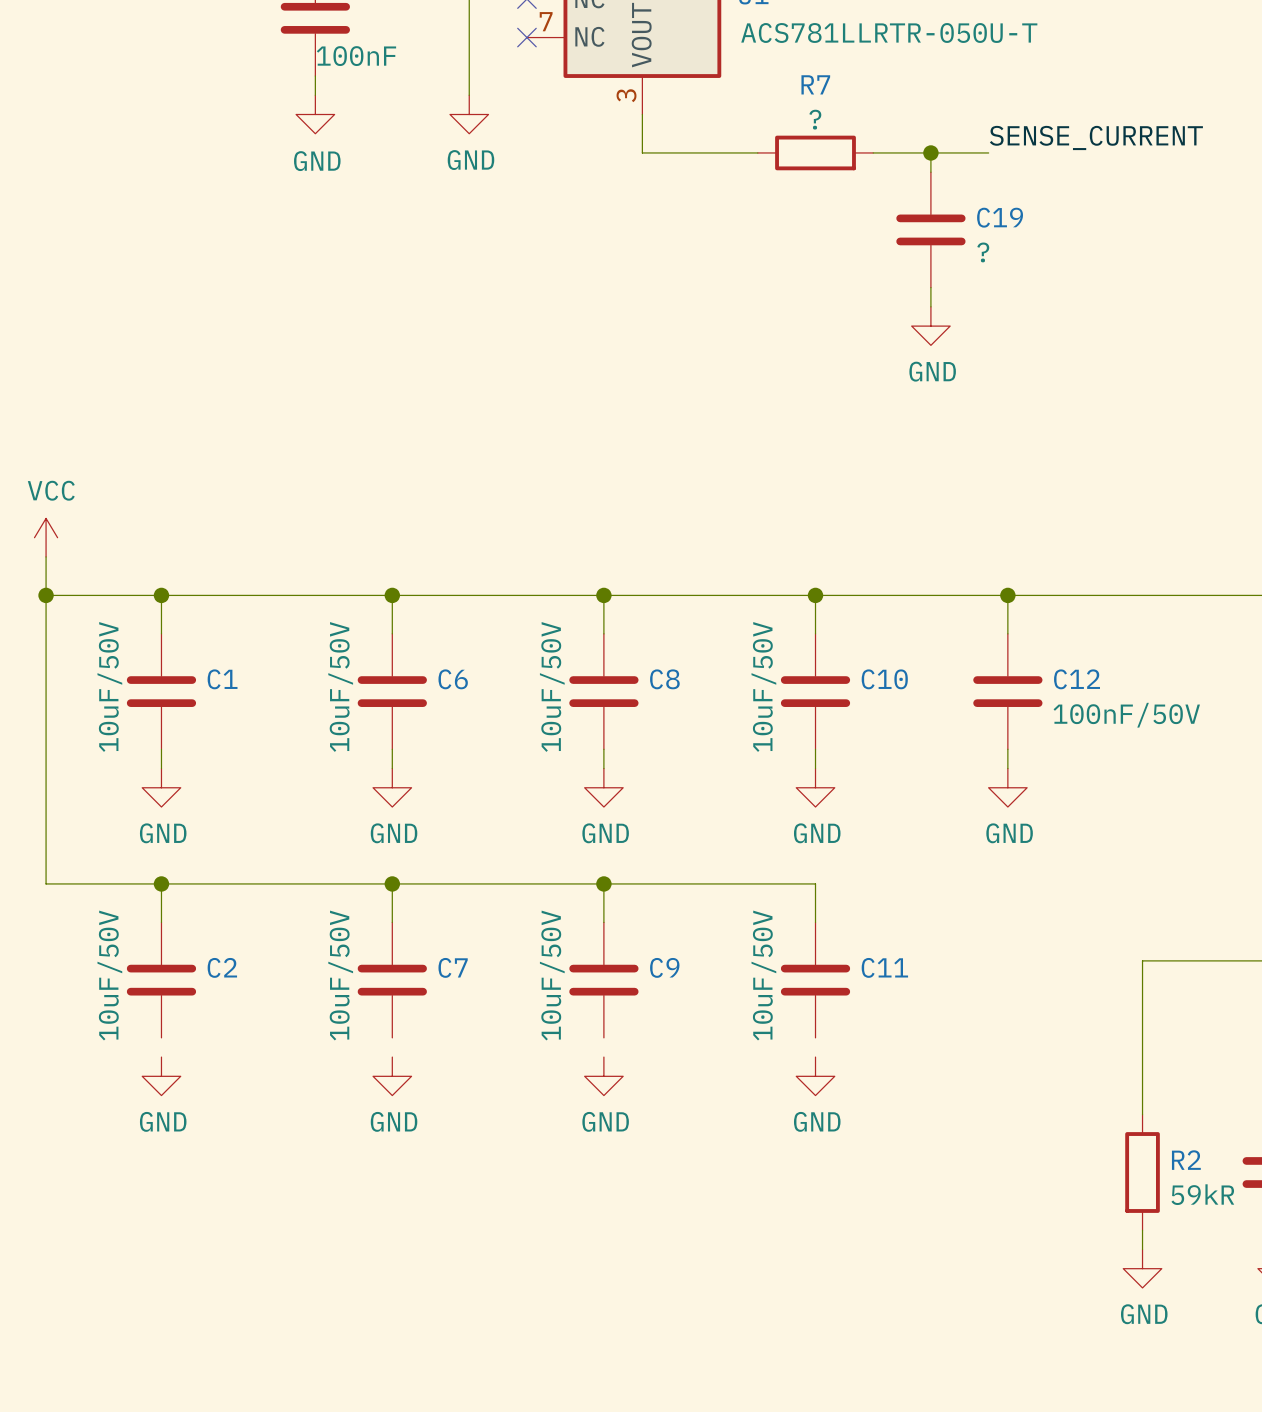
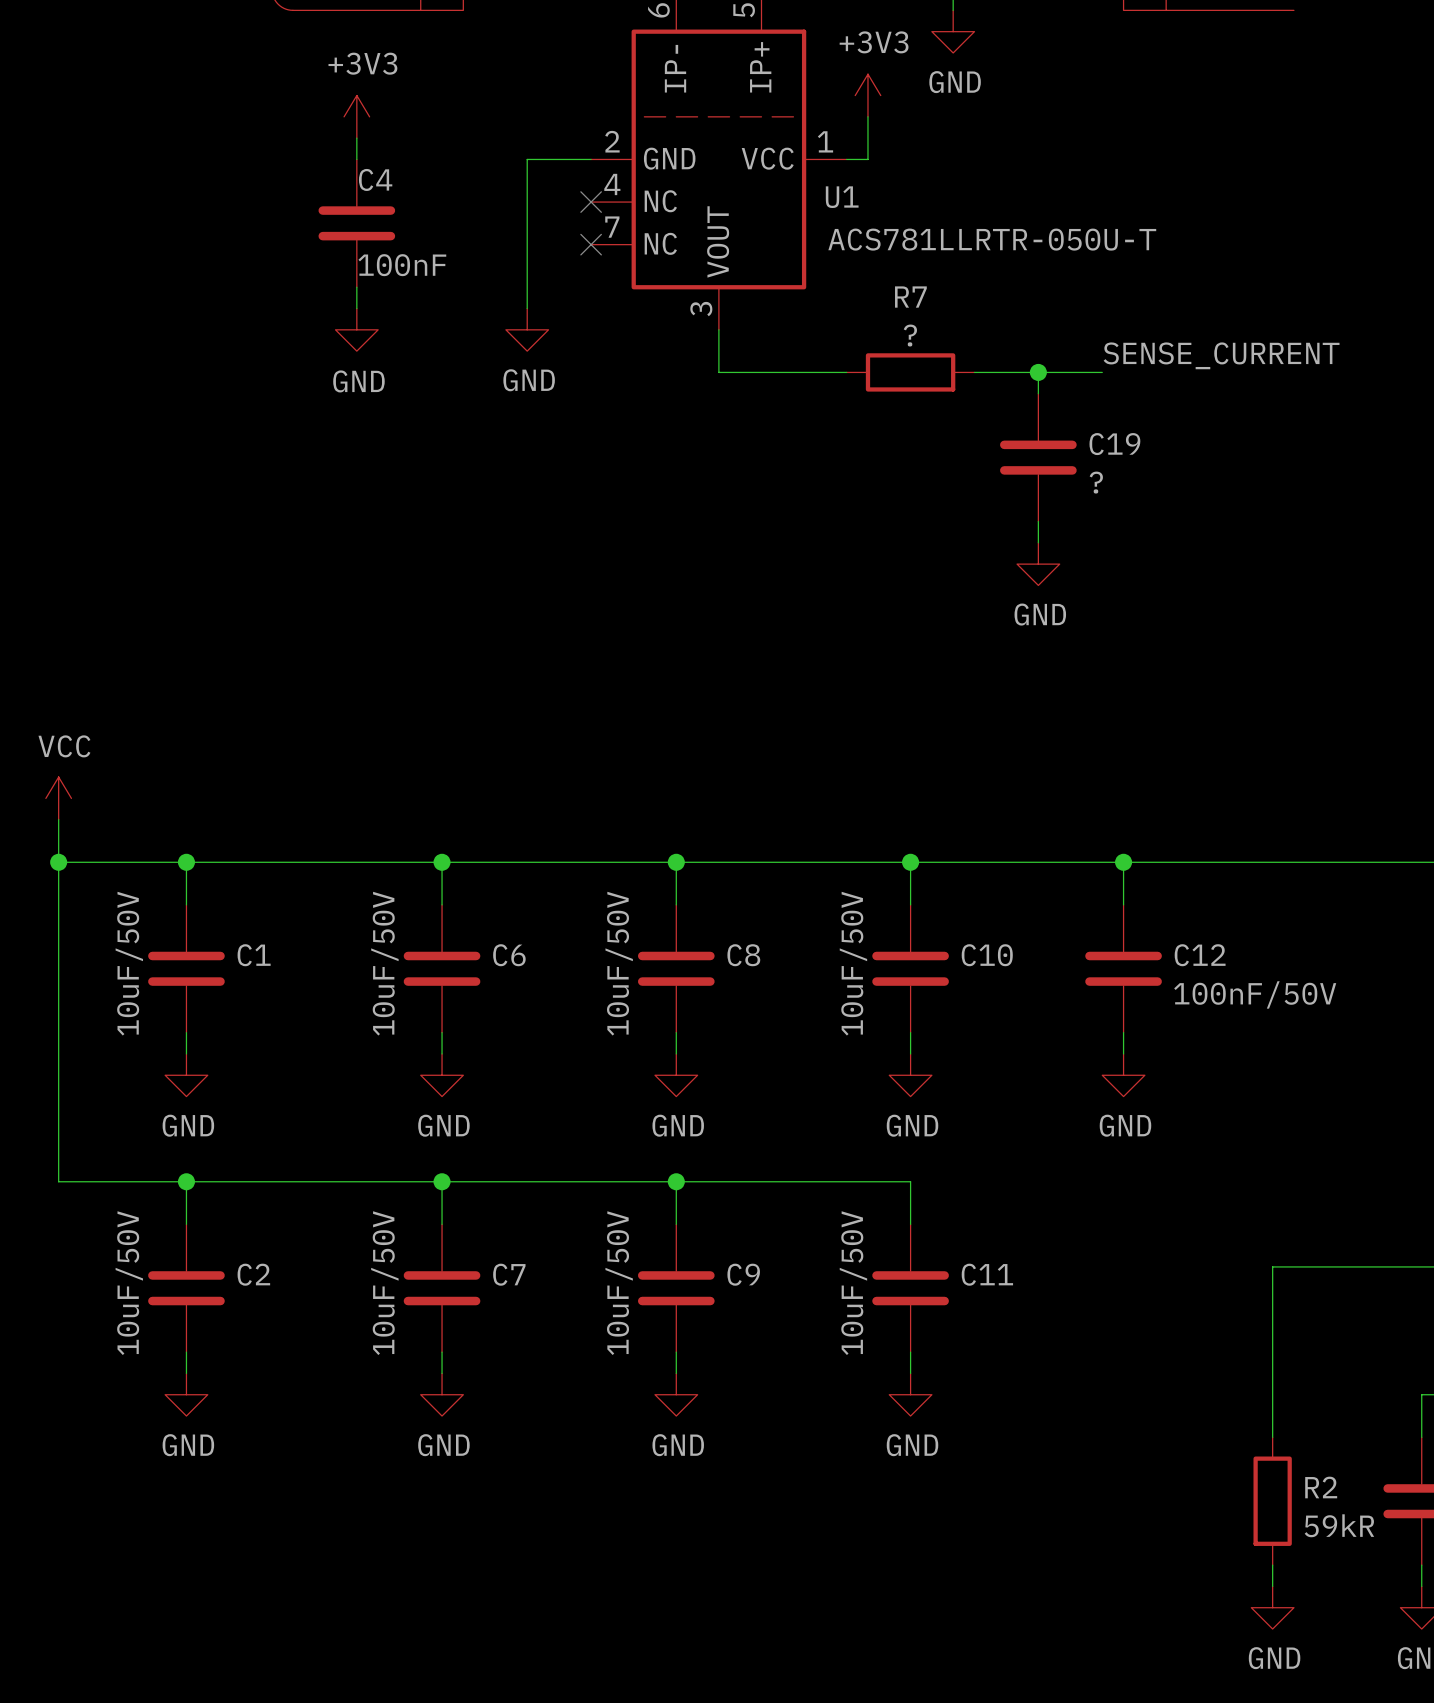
wire: none -> (186, 1352) (186, 1373)
wire: none -> (442, 1352) (442, 1373)
wire: none -> (676, 1352) (676, 1373)
wire: none -> (910, 1352) (910, 1373)

